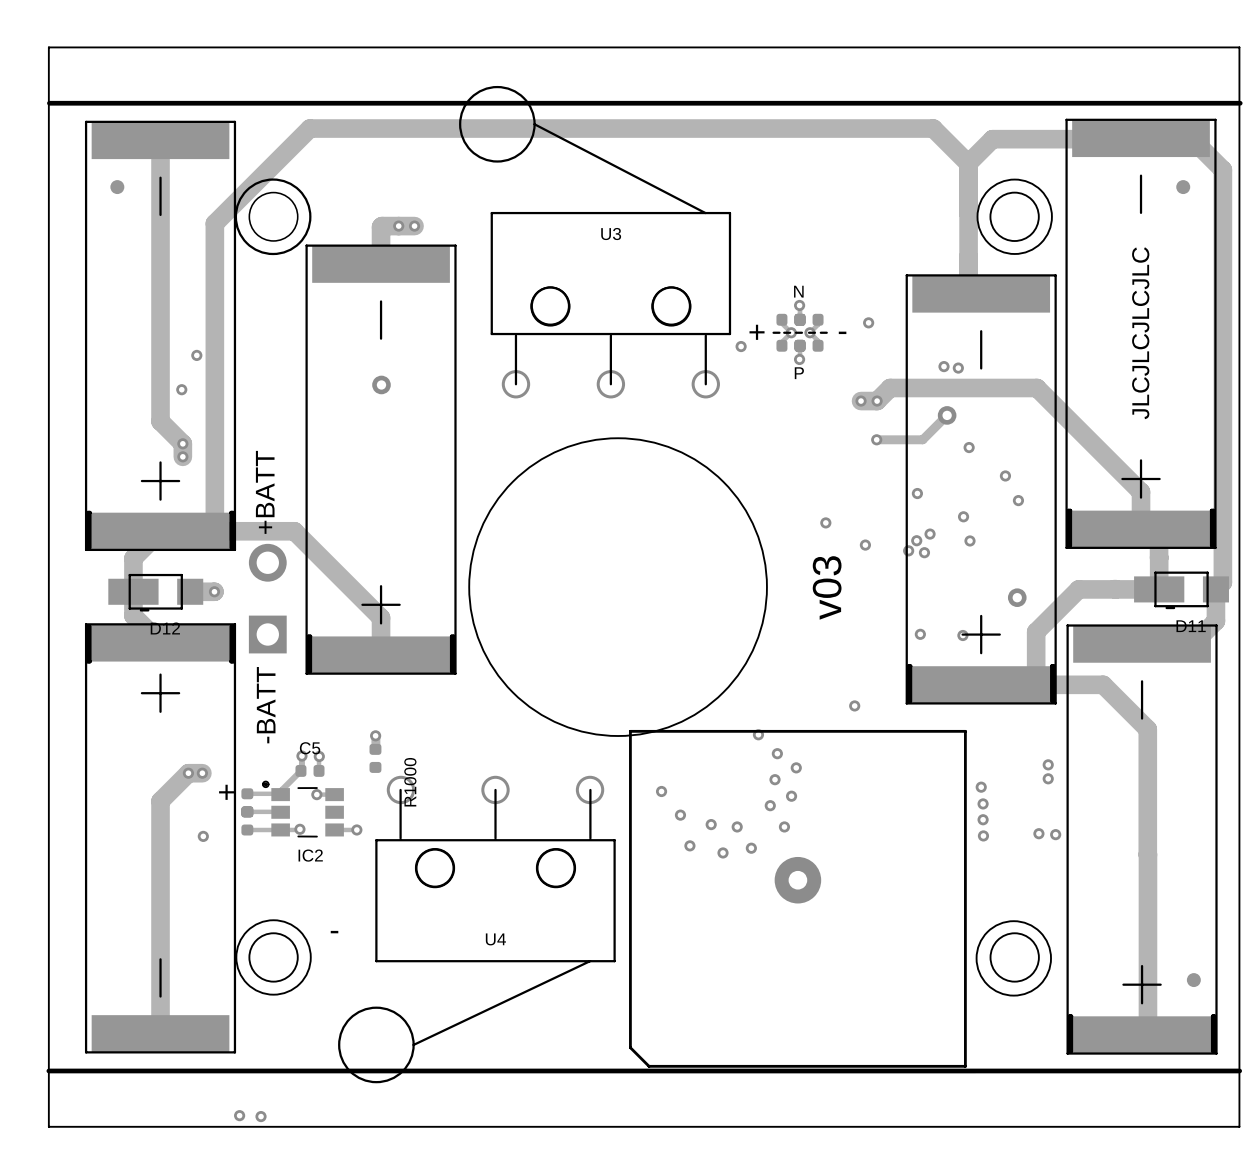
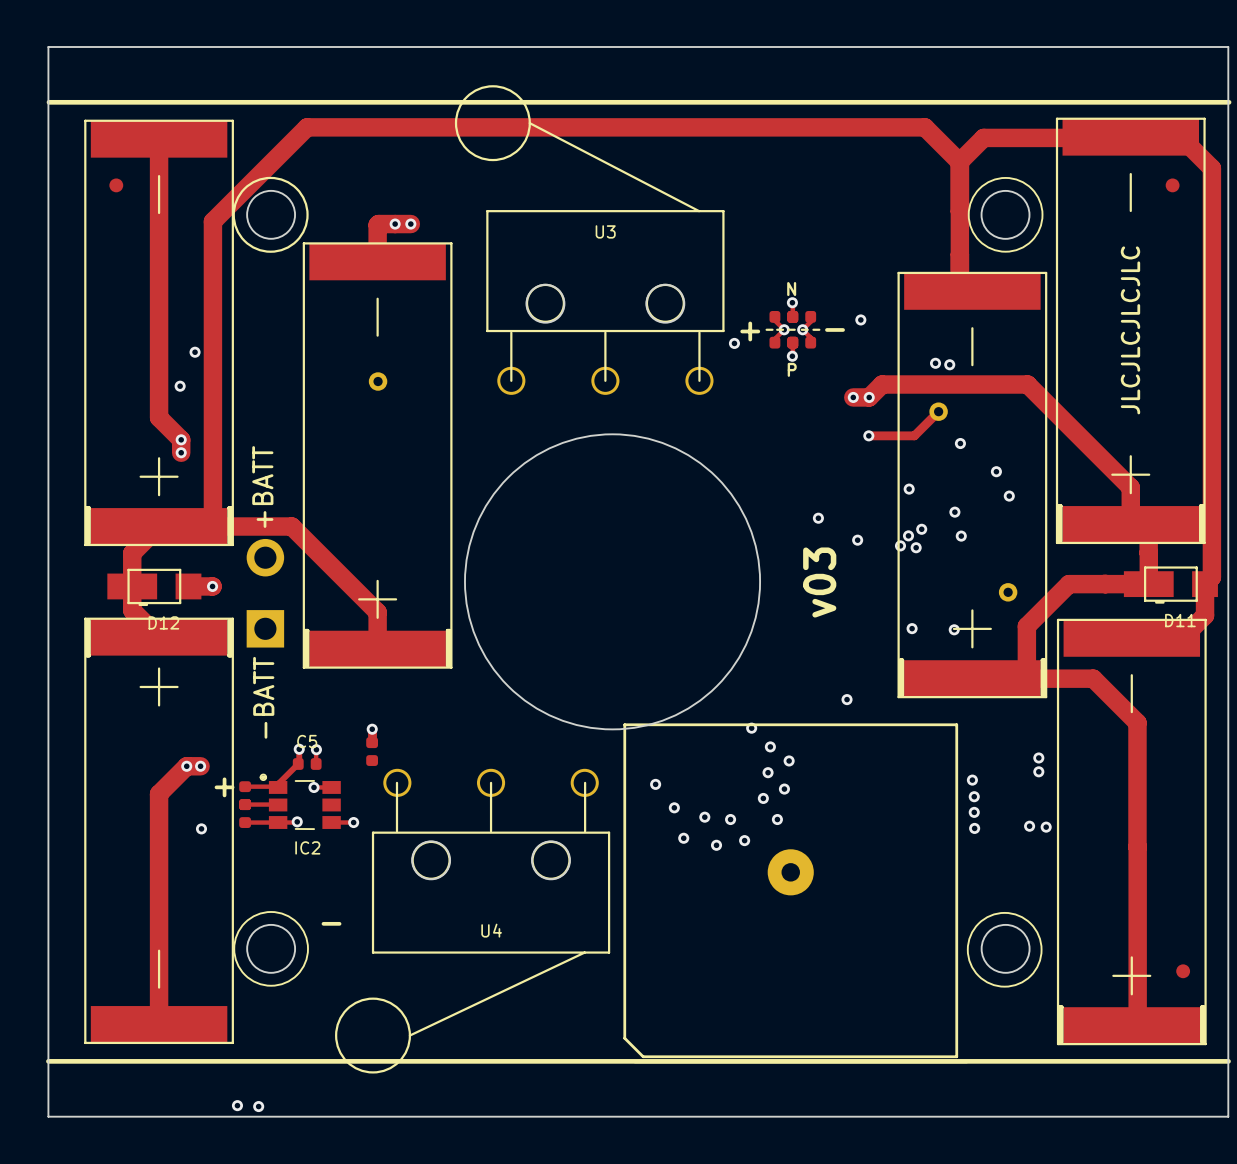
R1000 name: R1000 (410, 782) -> none

